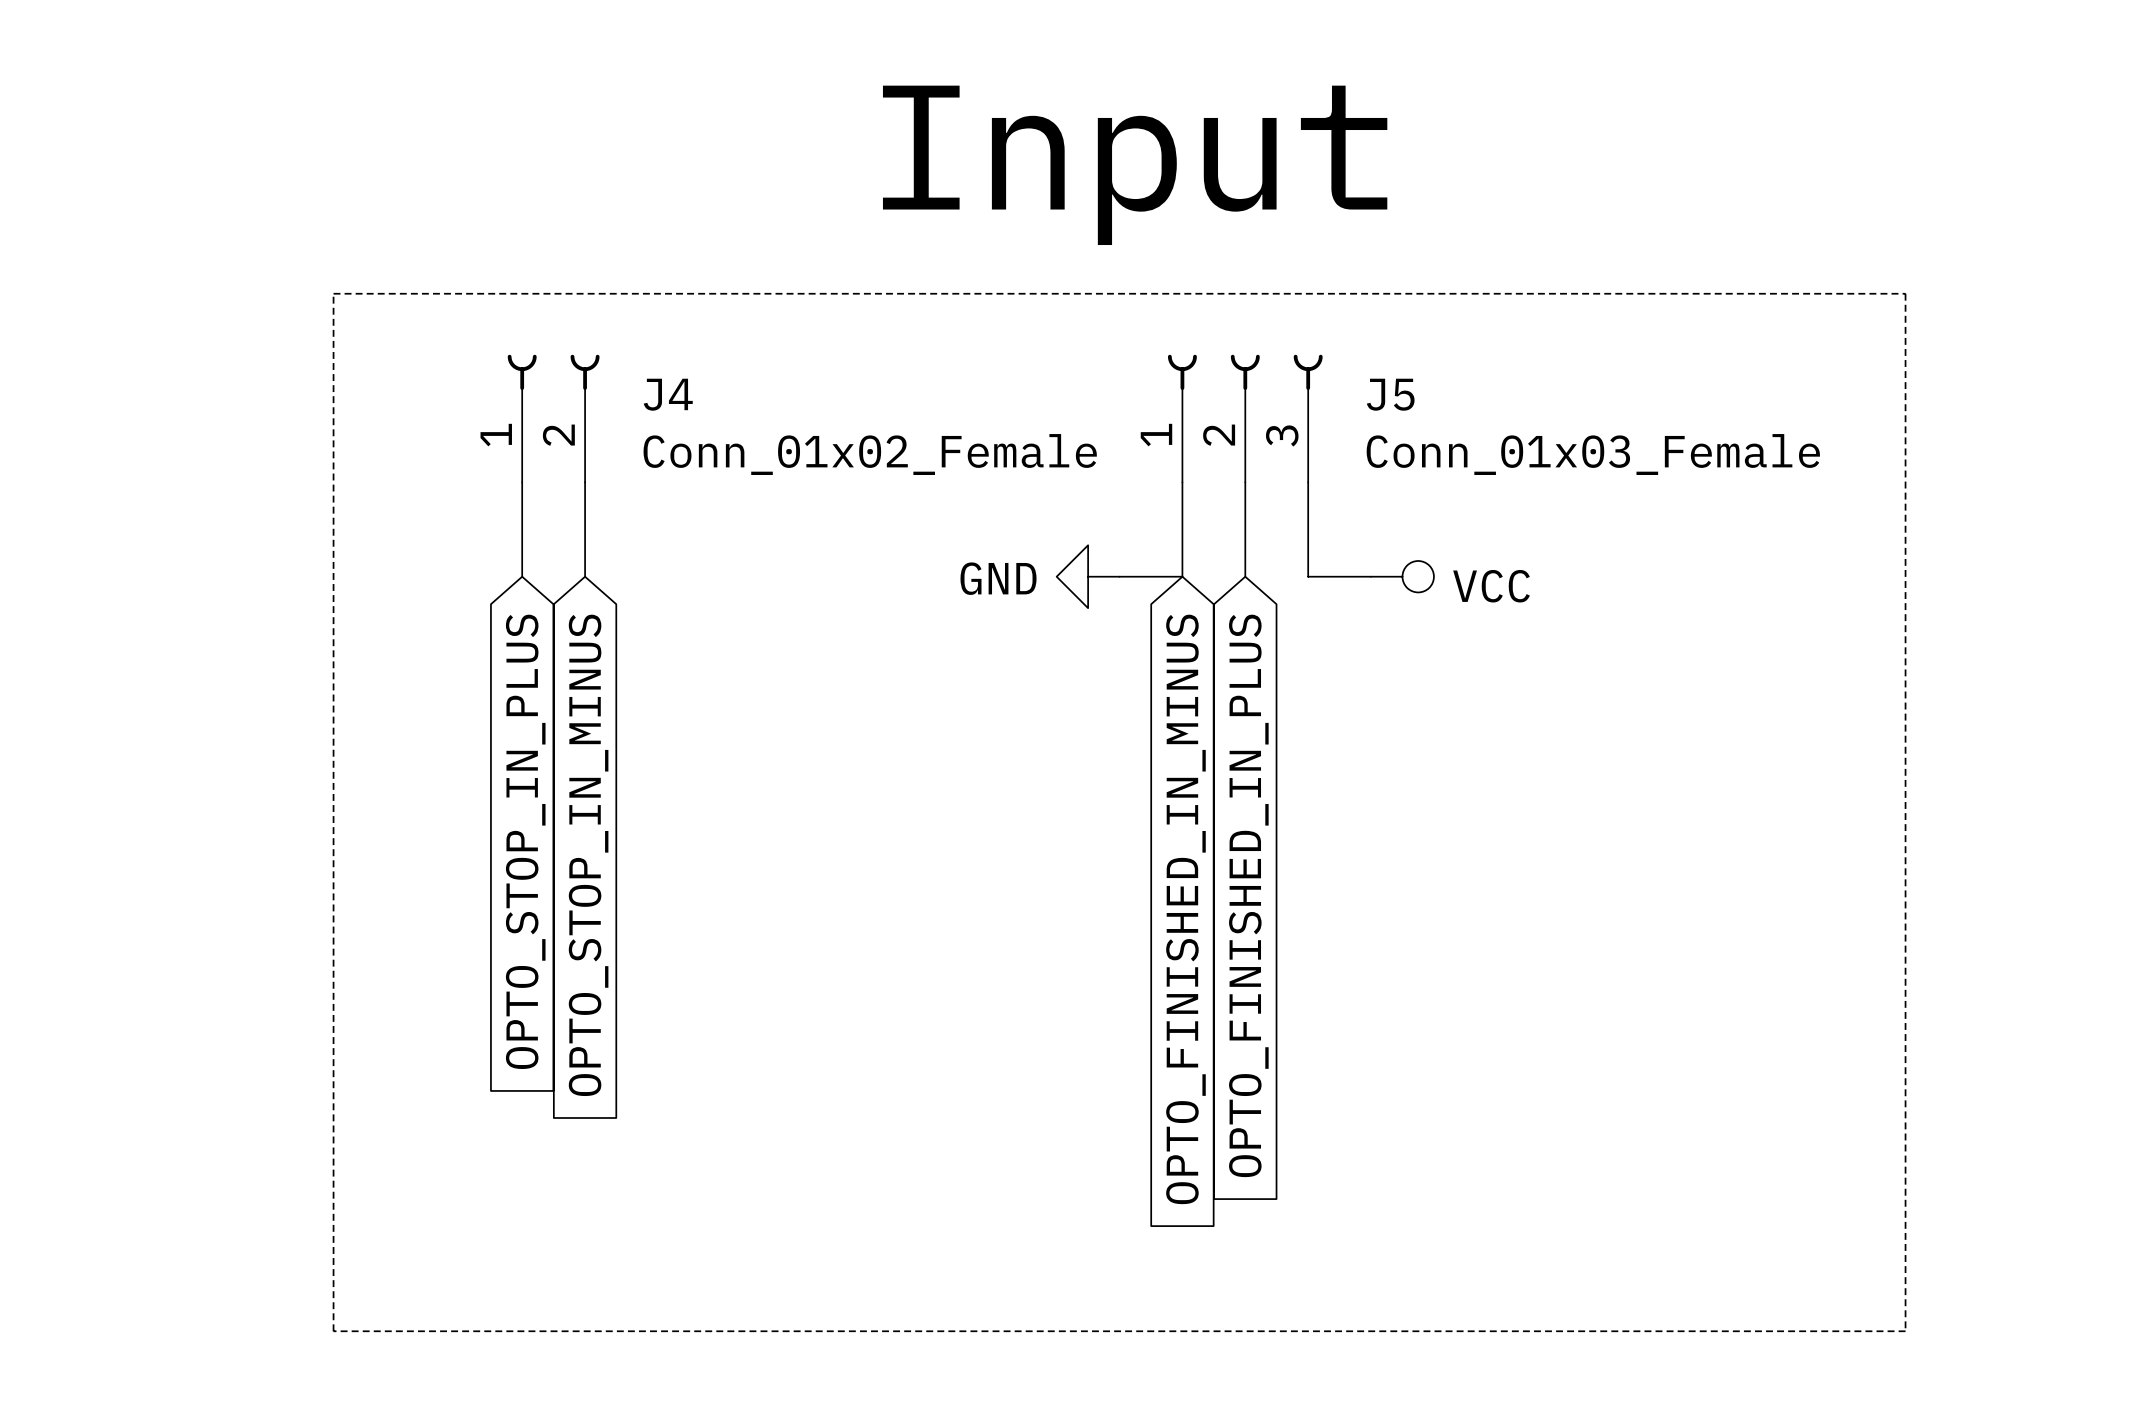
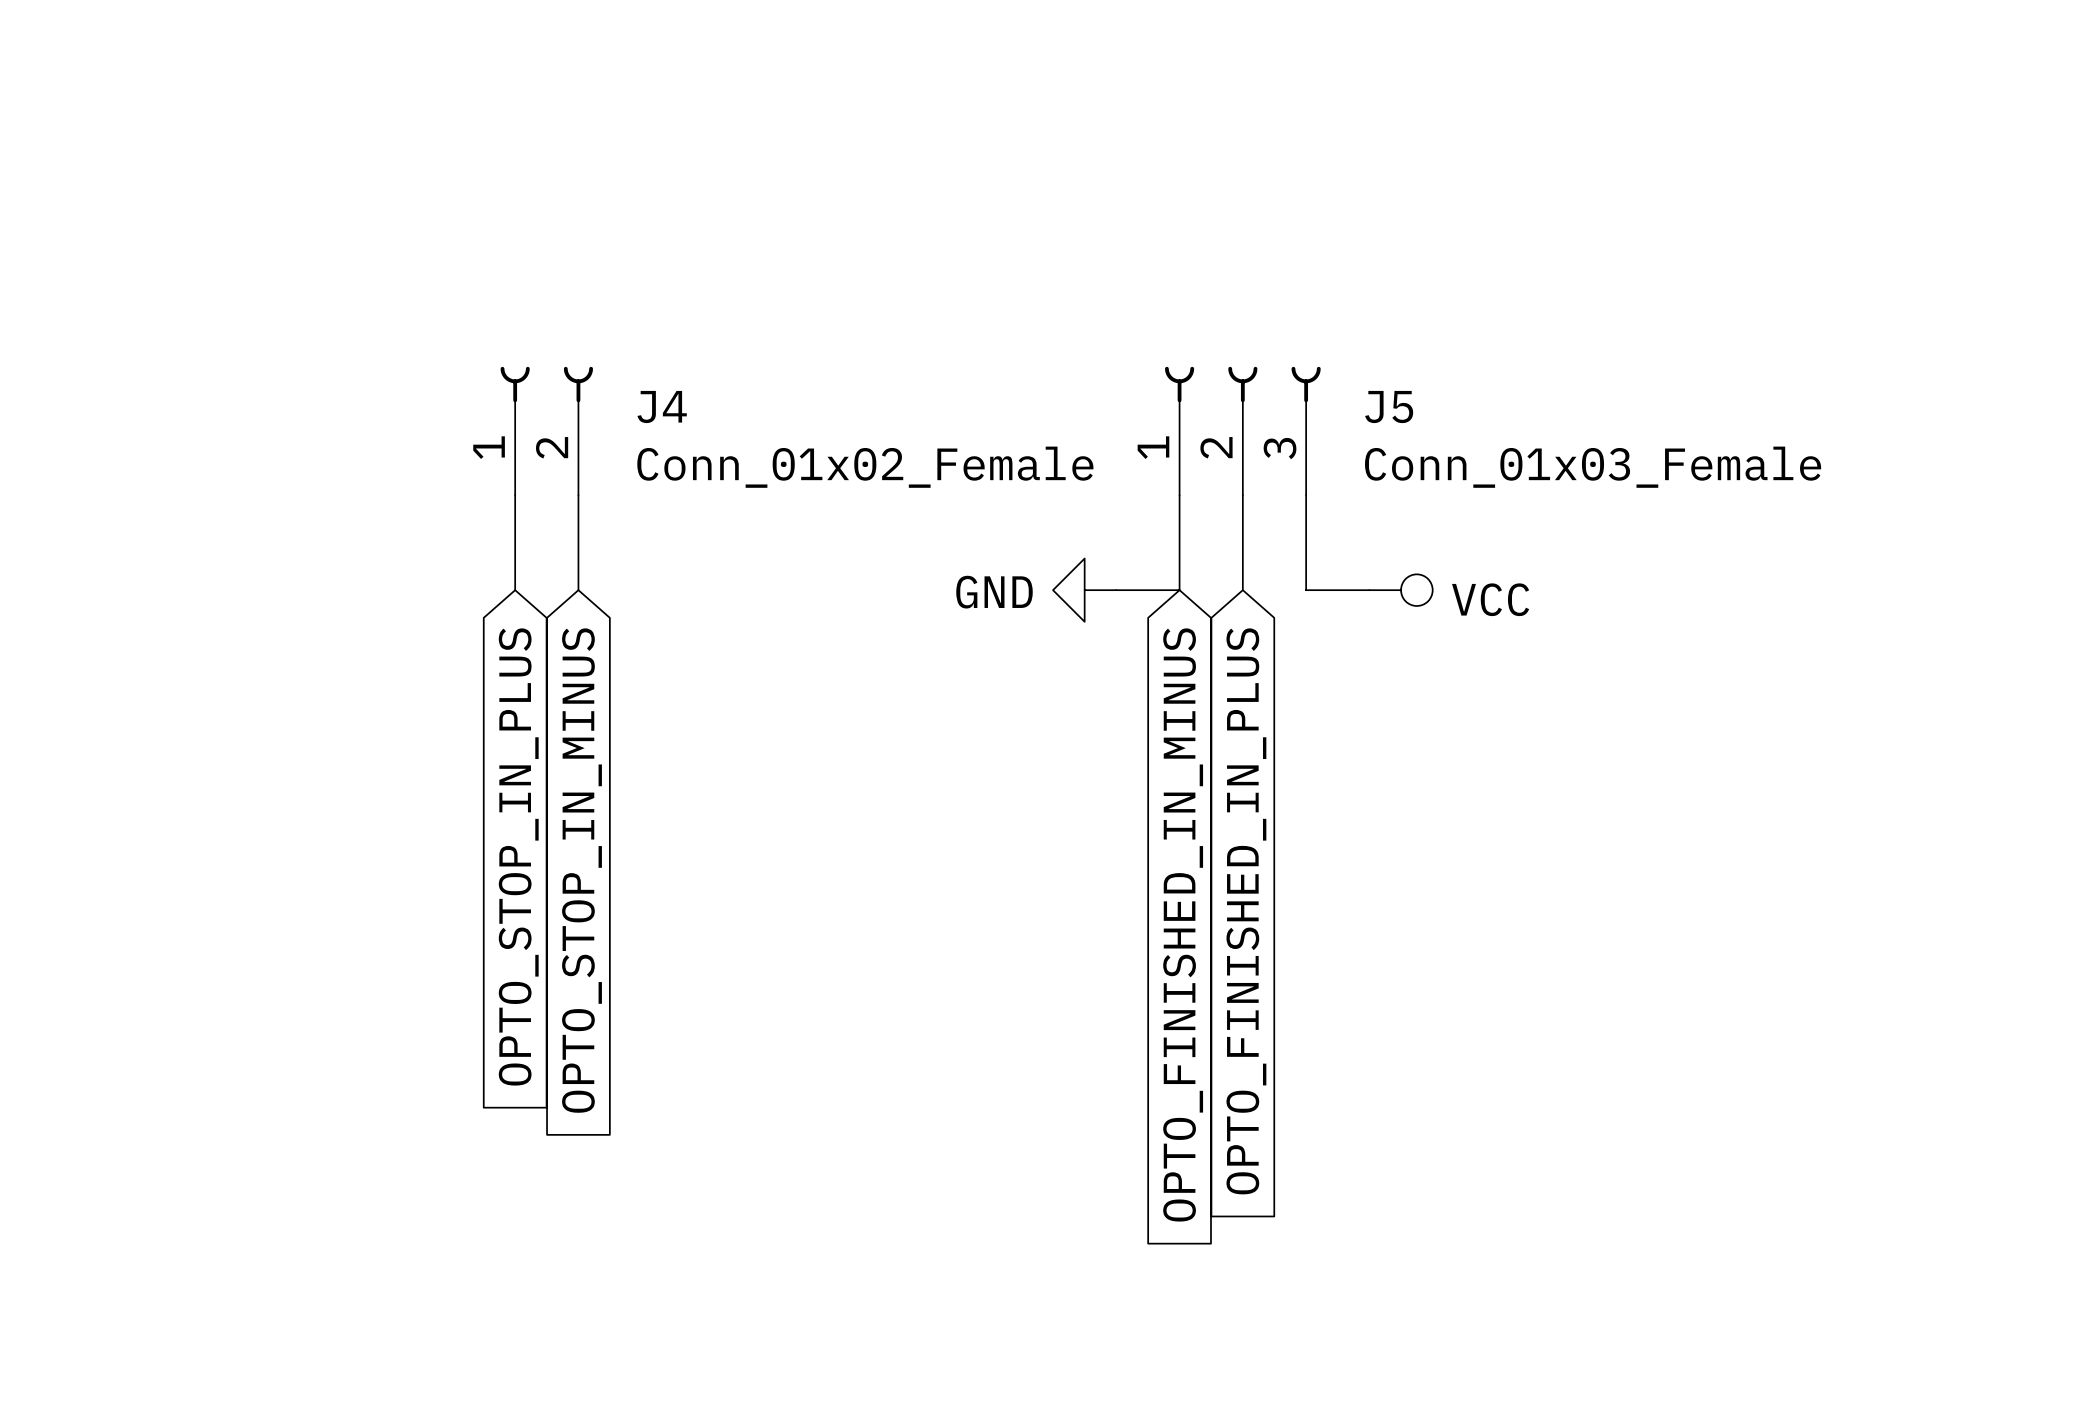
text: Input (1135, 165) -> none
line: (333, 293) (1905, 293) (1905, 1331) (333, 1331) (333, 293) -> none

